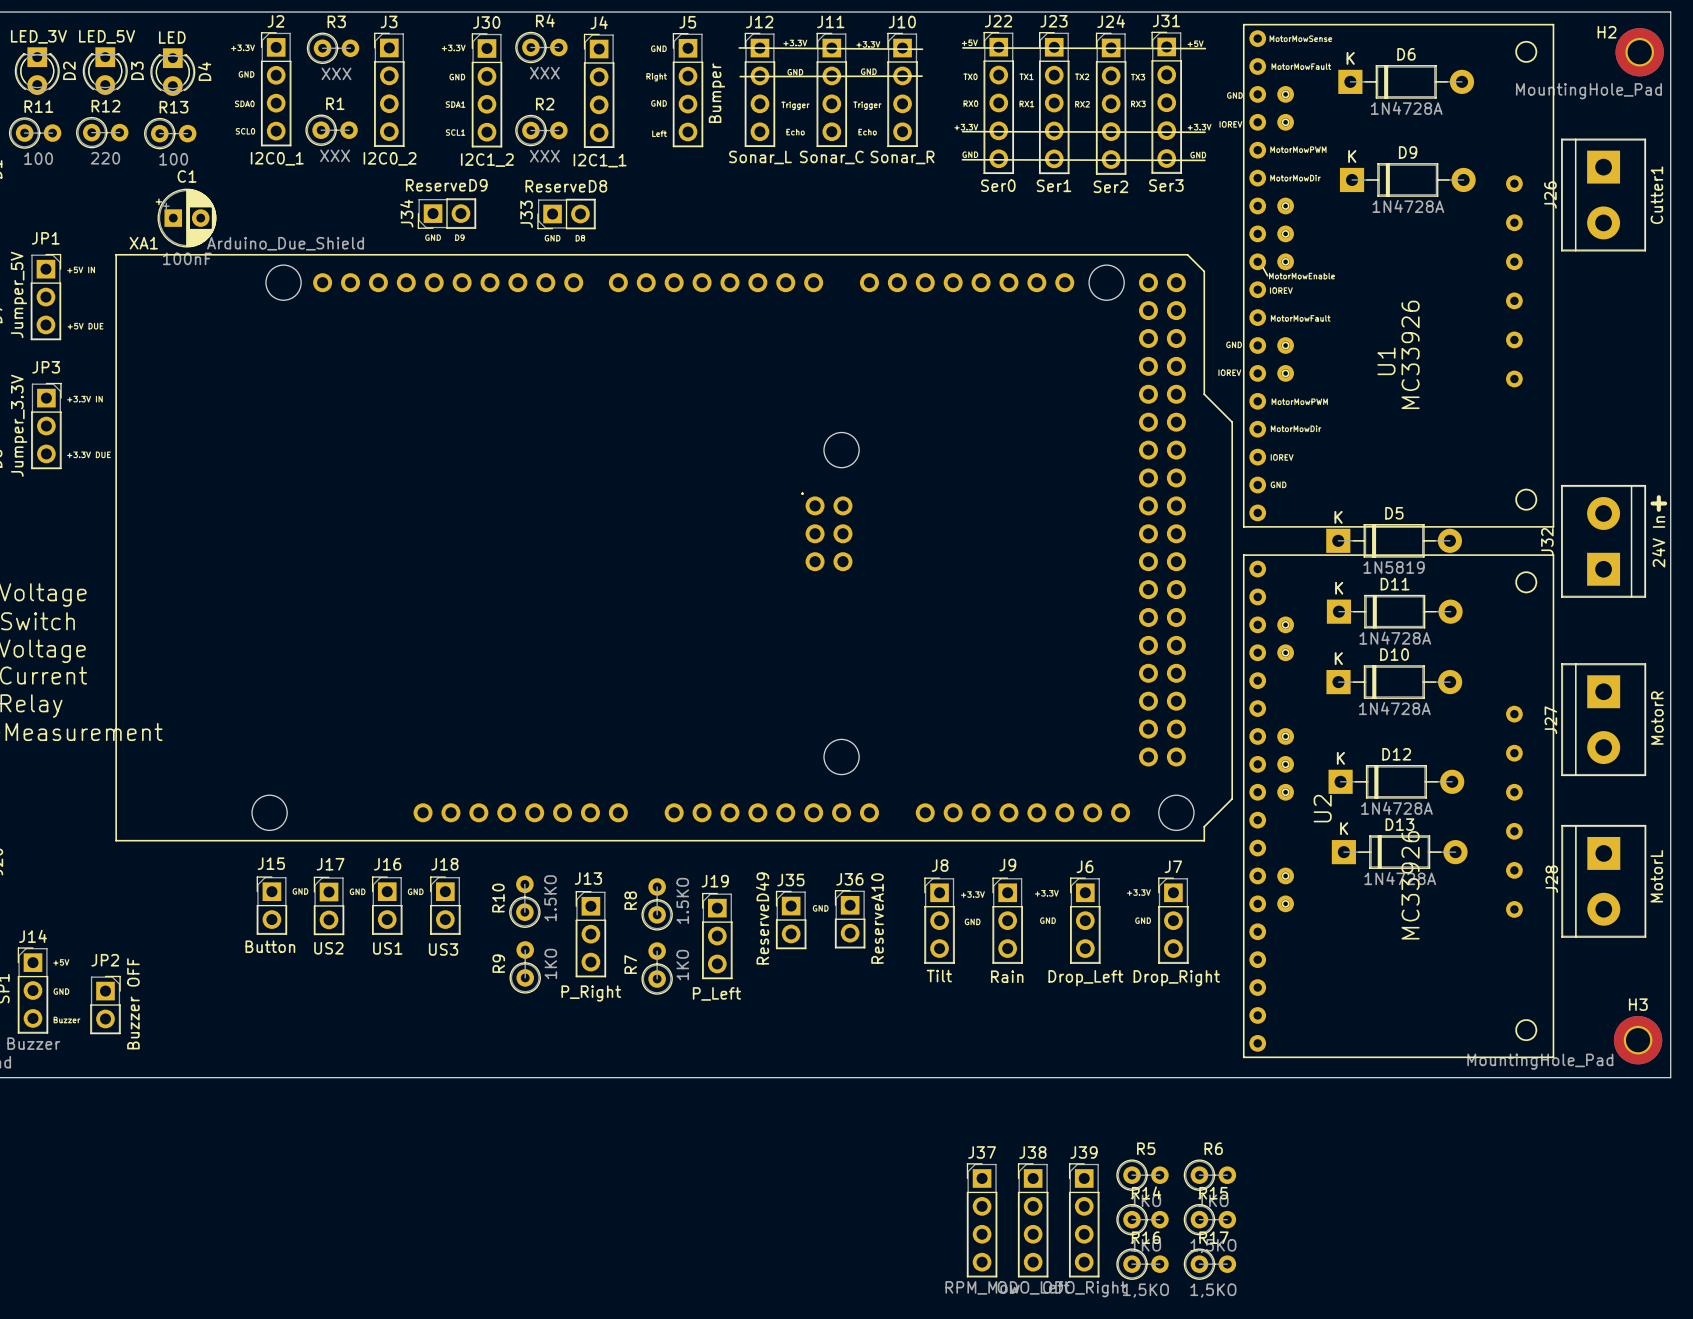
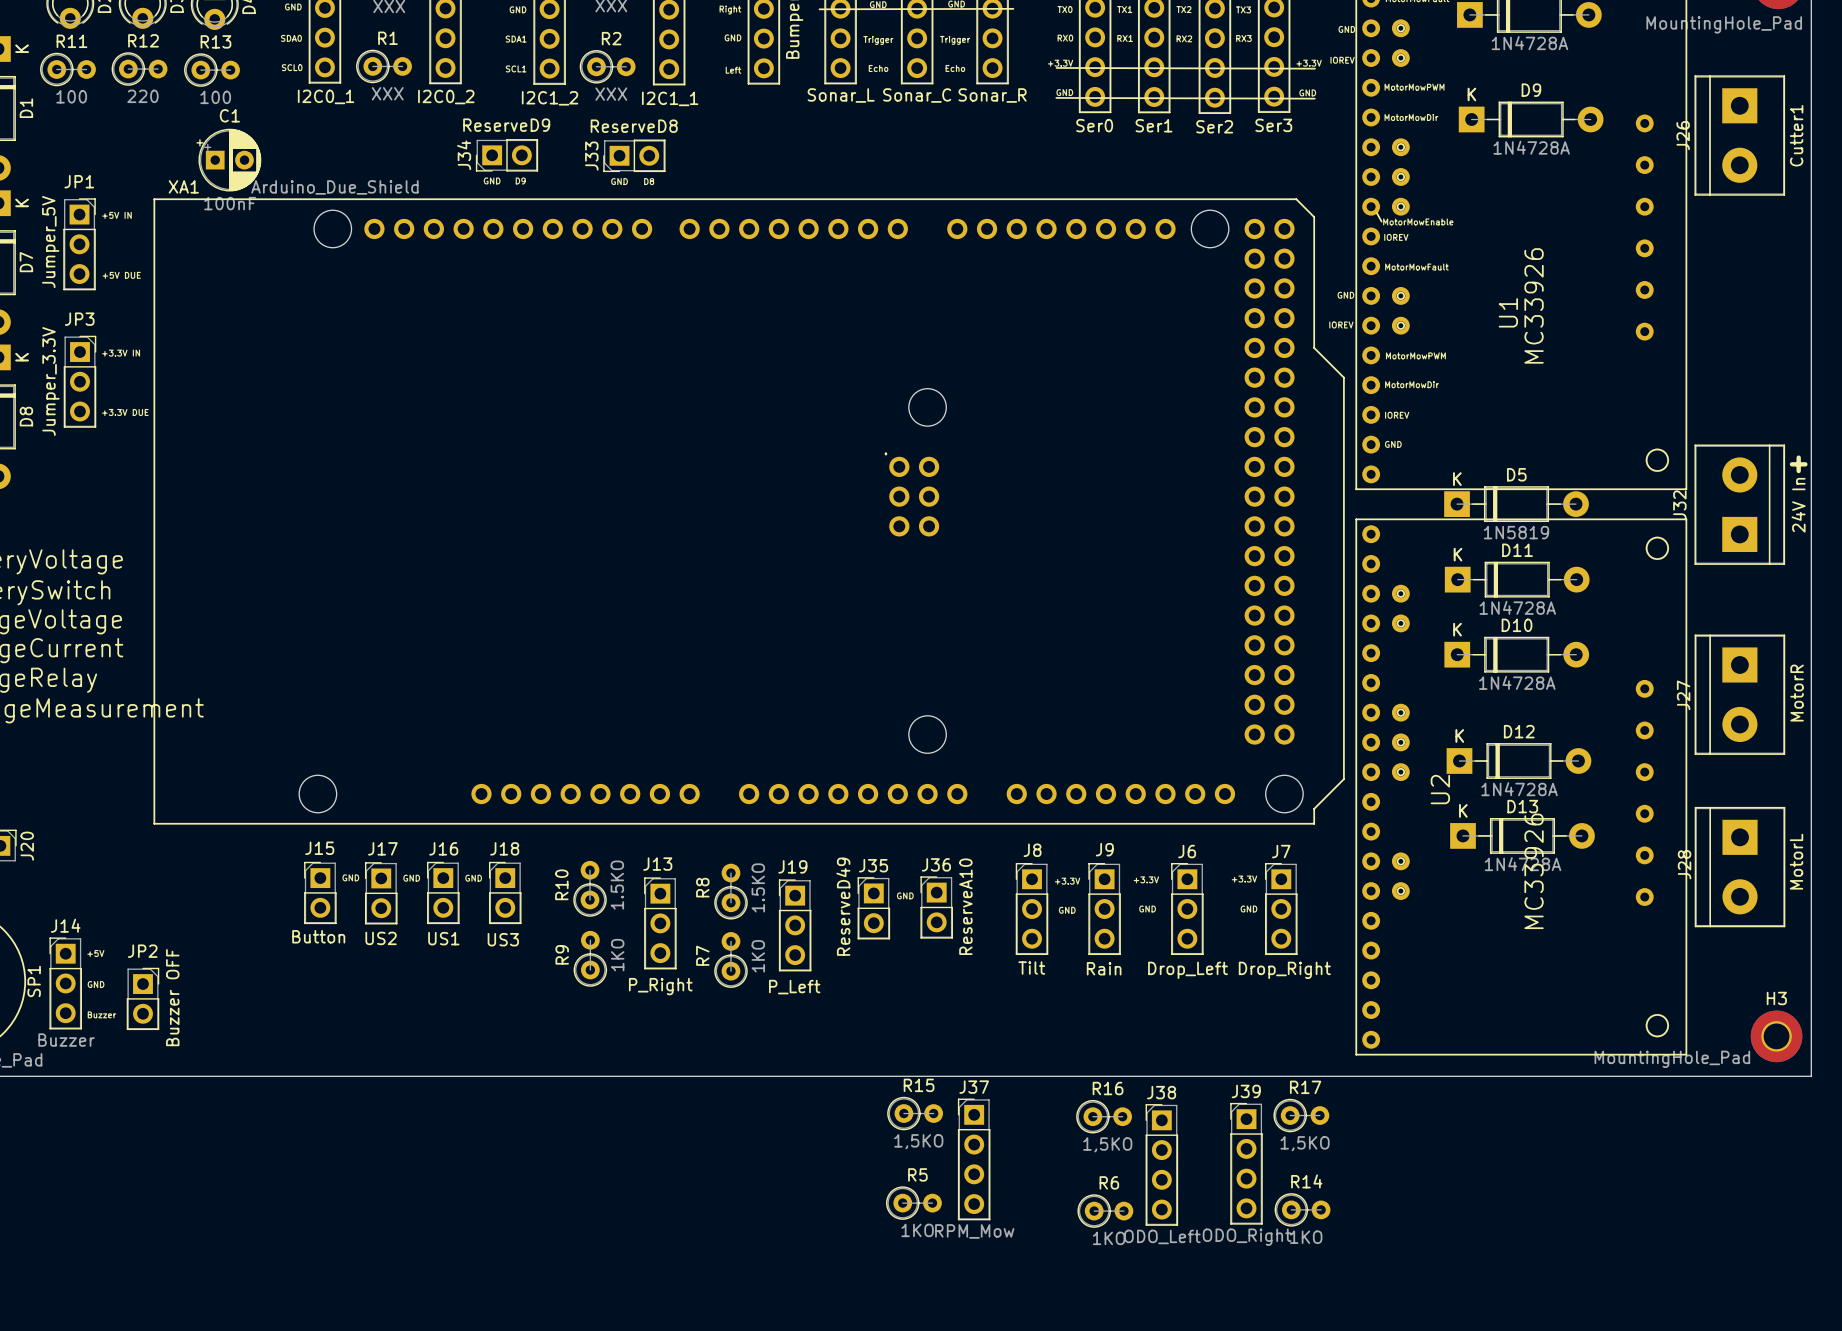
R5 position: (1142, 1175) -> (913, 1203)
R6 position: (1209, 1175) -> (1105, 1211)
R14 position: (1142, 1219) -> (1302, 1209)
R15 position: (1209, 1219) -> (915, 1113)
J37 position: (982, 1220) -> (974, 1159)
J38 position: (1033, 1220) -> (1161, 1164)
J39 position: (1084, 1220) -> (1246, 1163)
R16 position: (1142, 1264) -> (1104, 1116)
R17 position: (1209, 1264) -> (1301, 1115)

